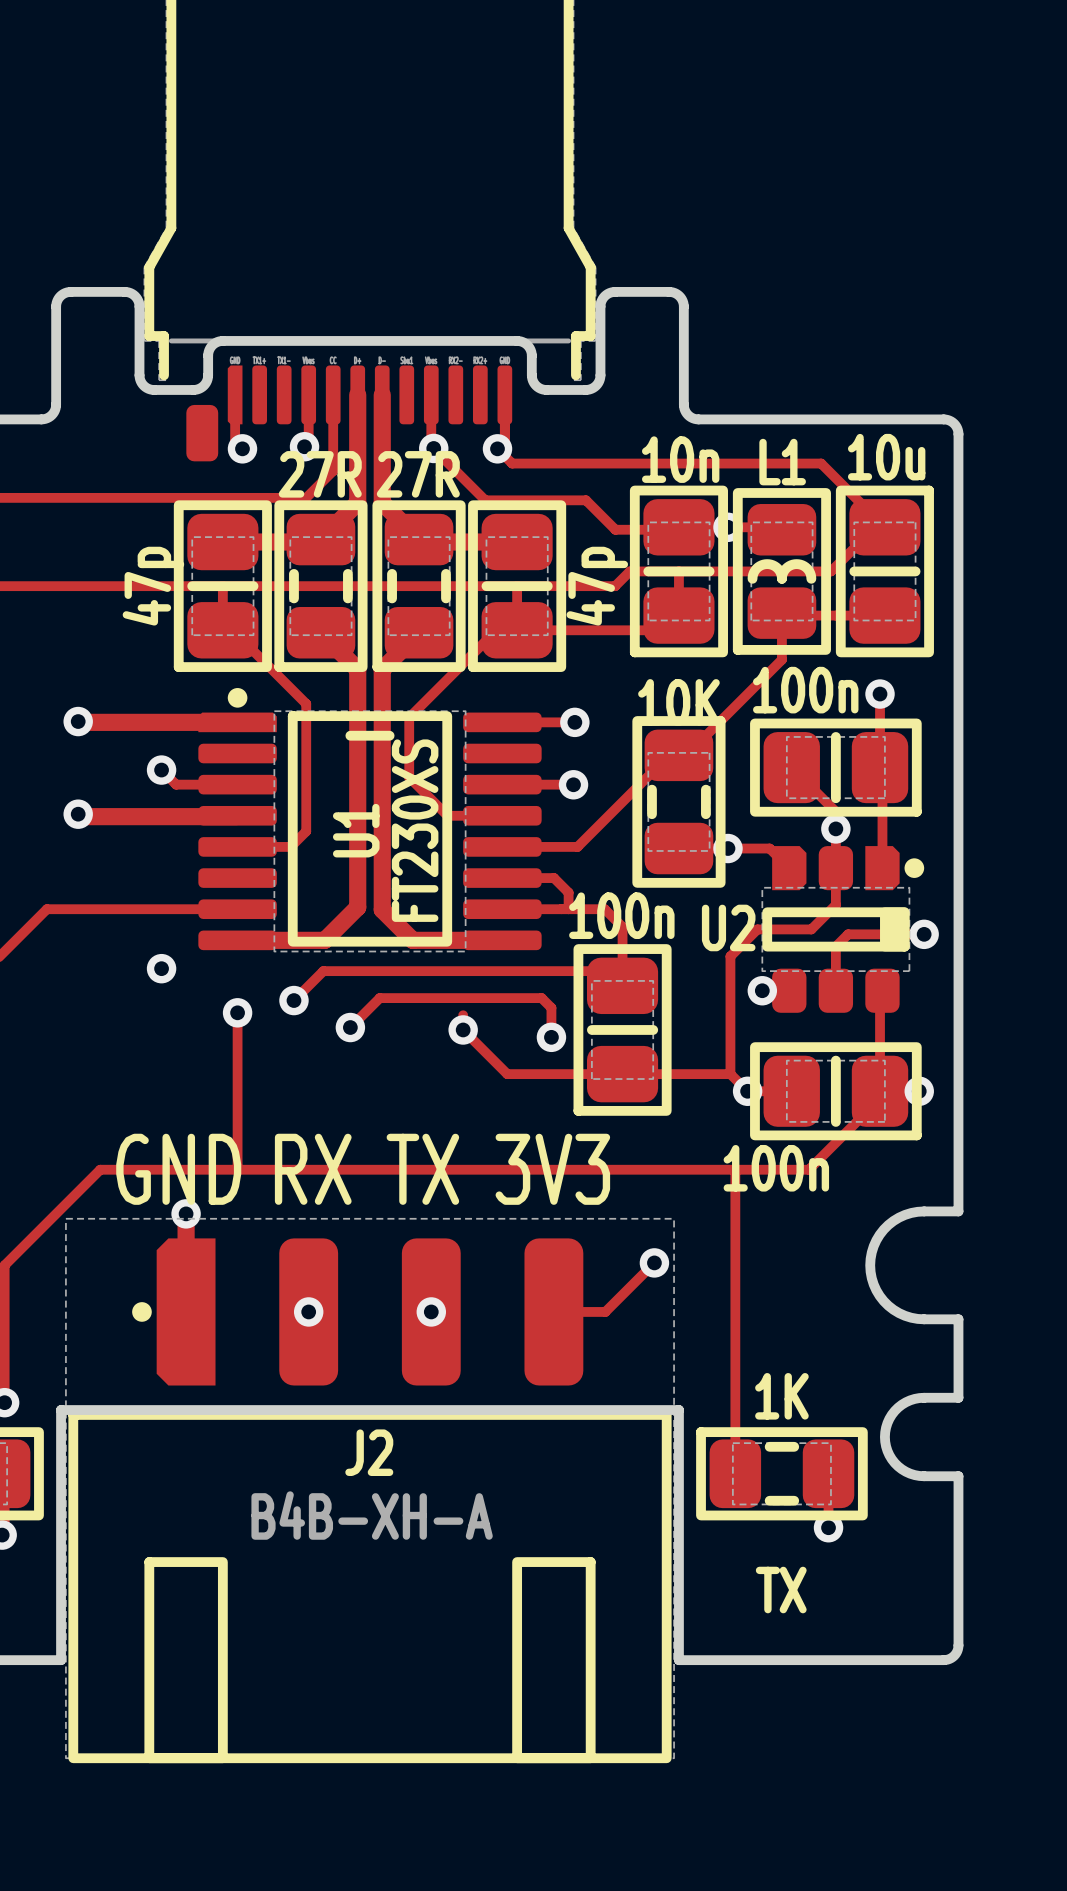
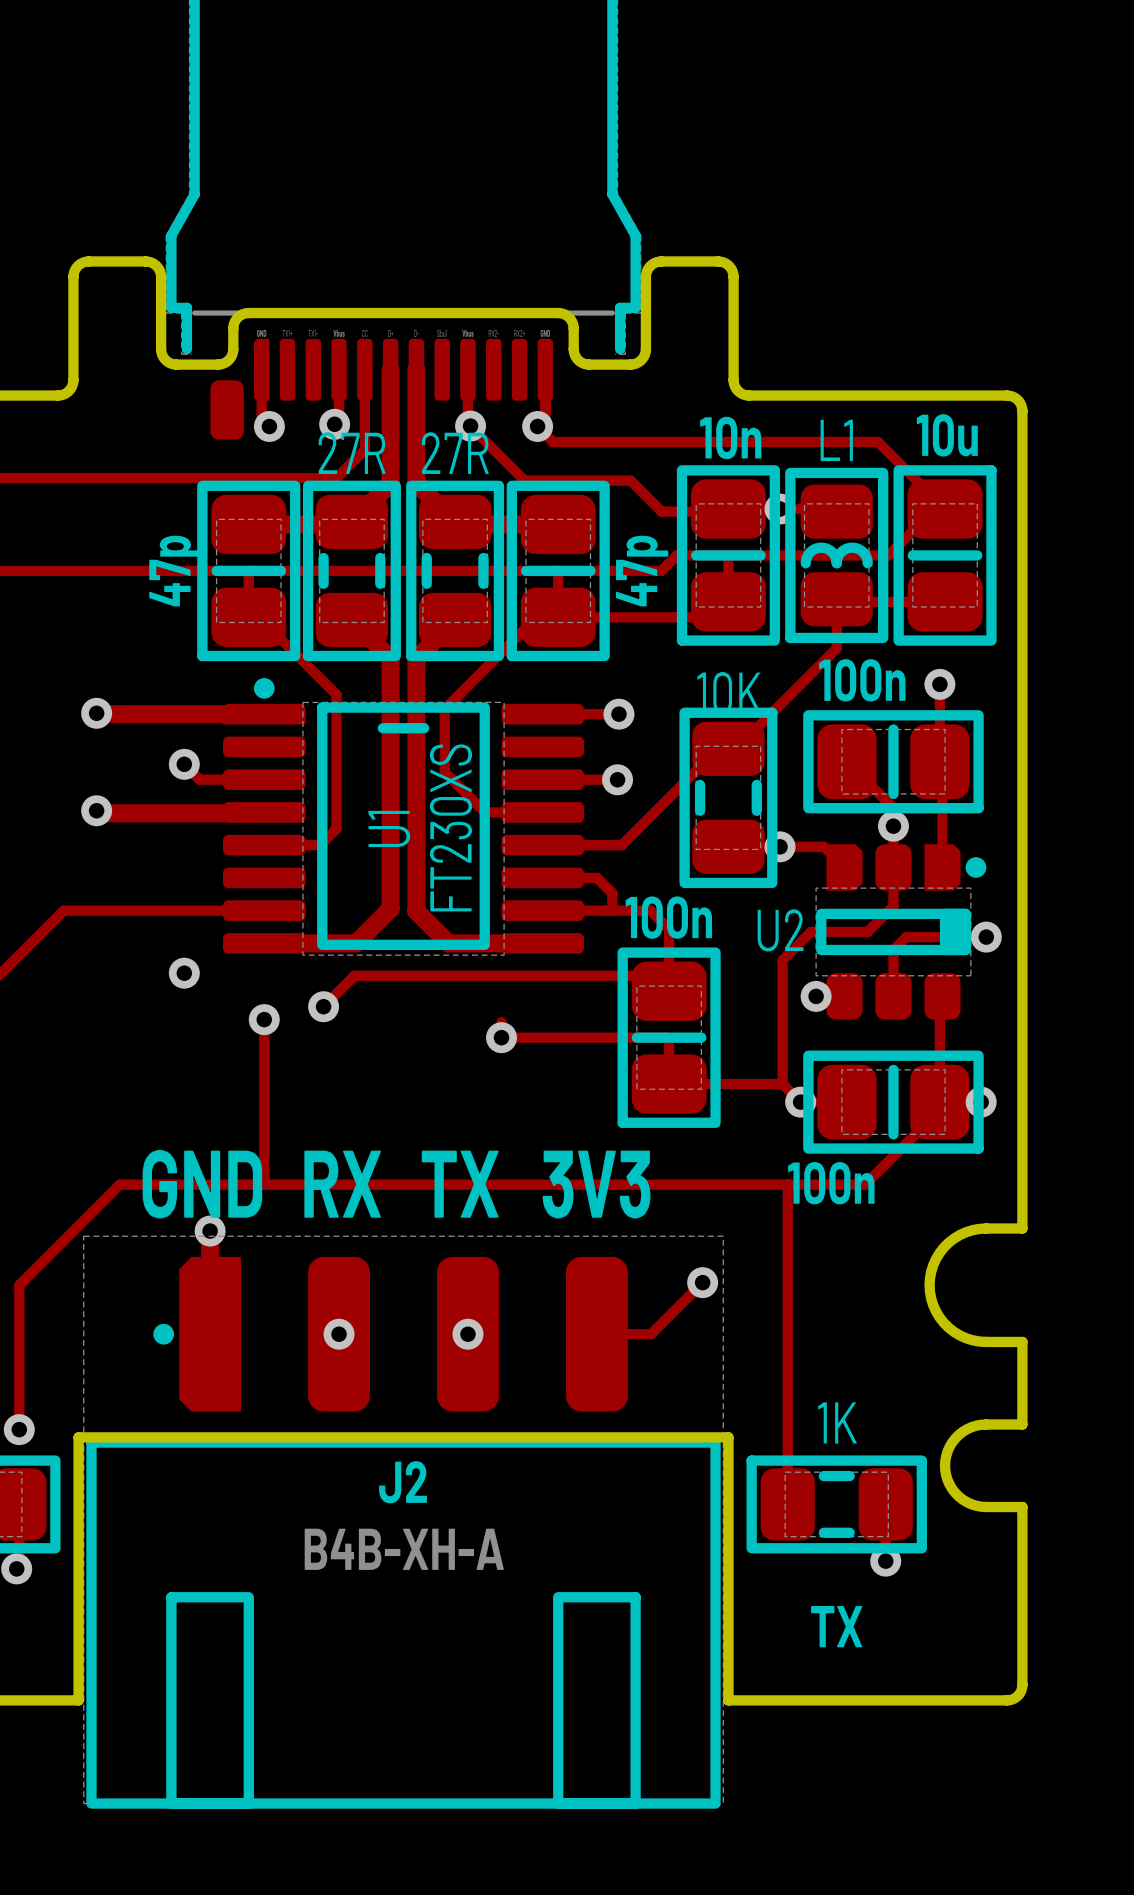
track: (350, 1027) (379, 998) (541, 998) (551, 1007) (551, 1037) -> none
via: (350, 1027) -> none
track: (463, 1029) (507, 1074) (622, 1074) -> (501, 1037) (666, 1037) (669, 1040) (669, 1068)
via: (551, 1037) -> none

